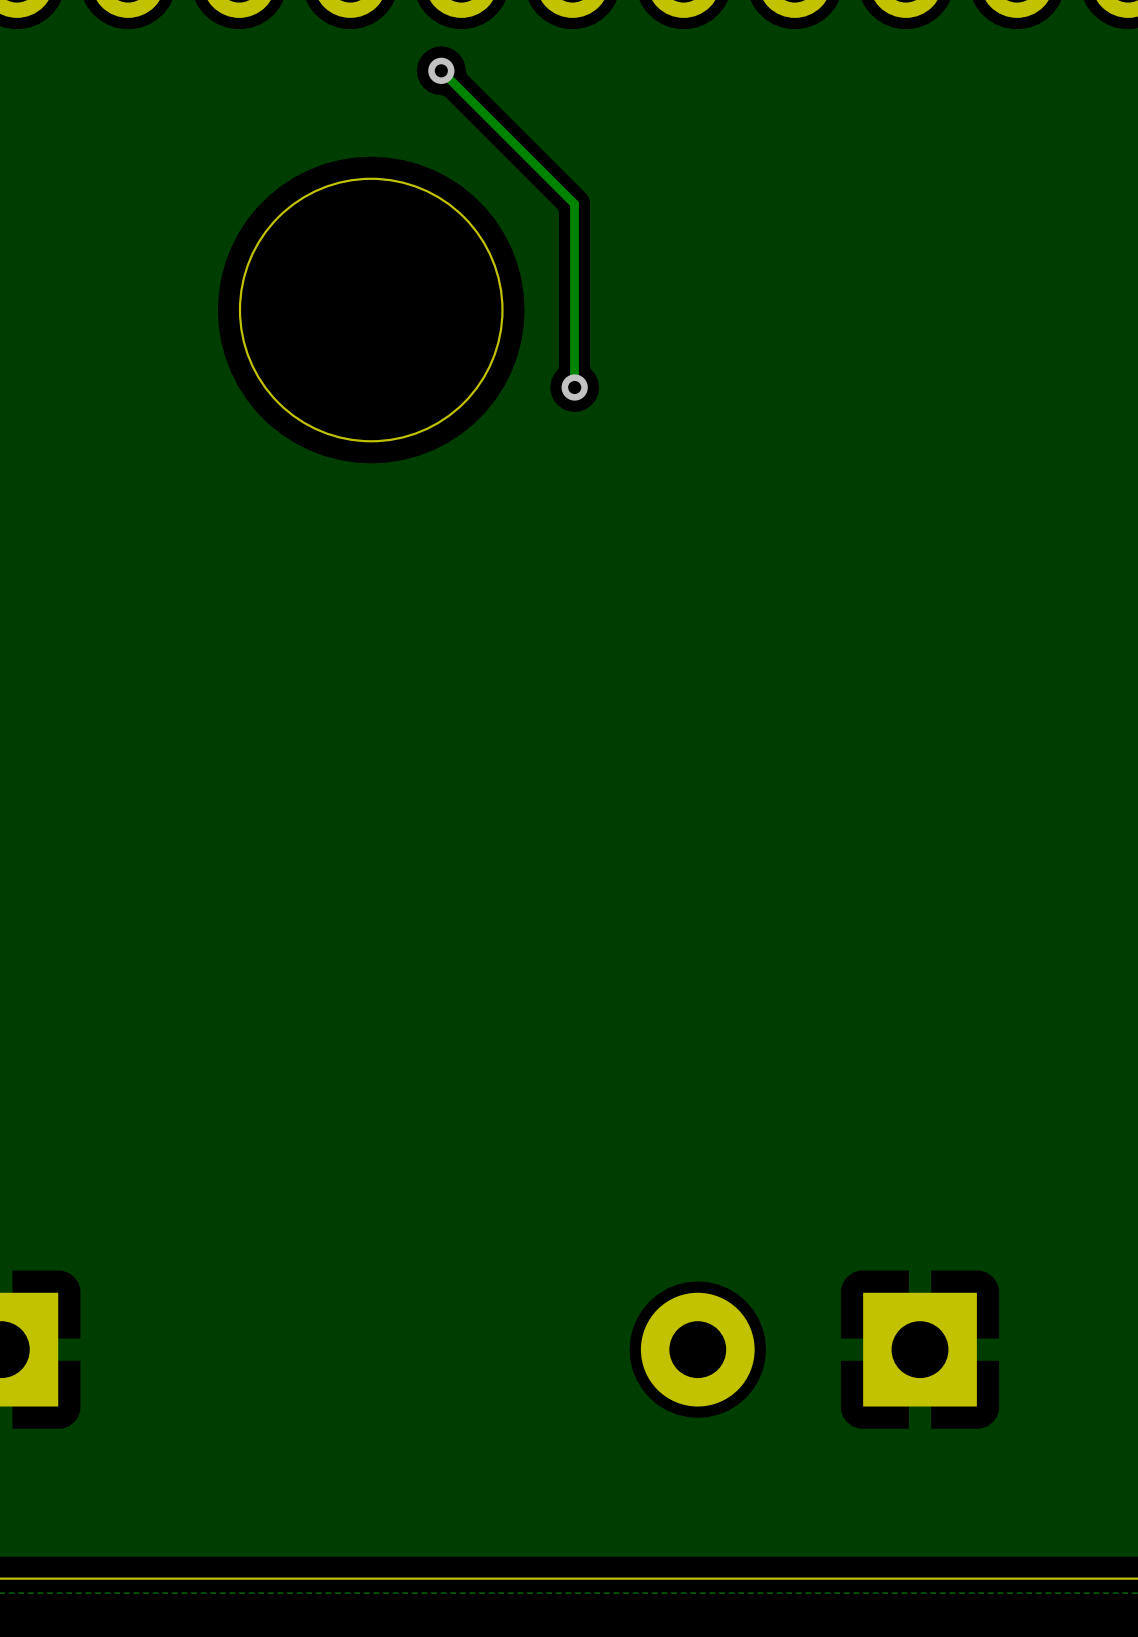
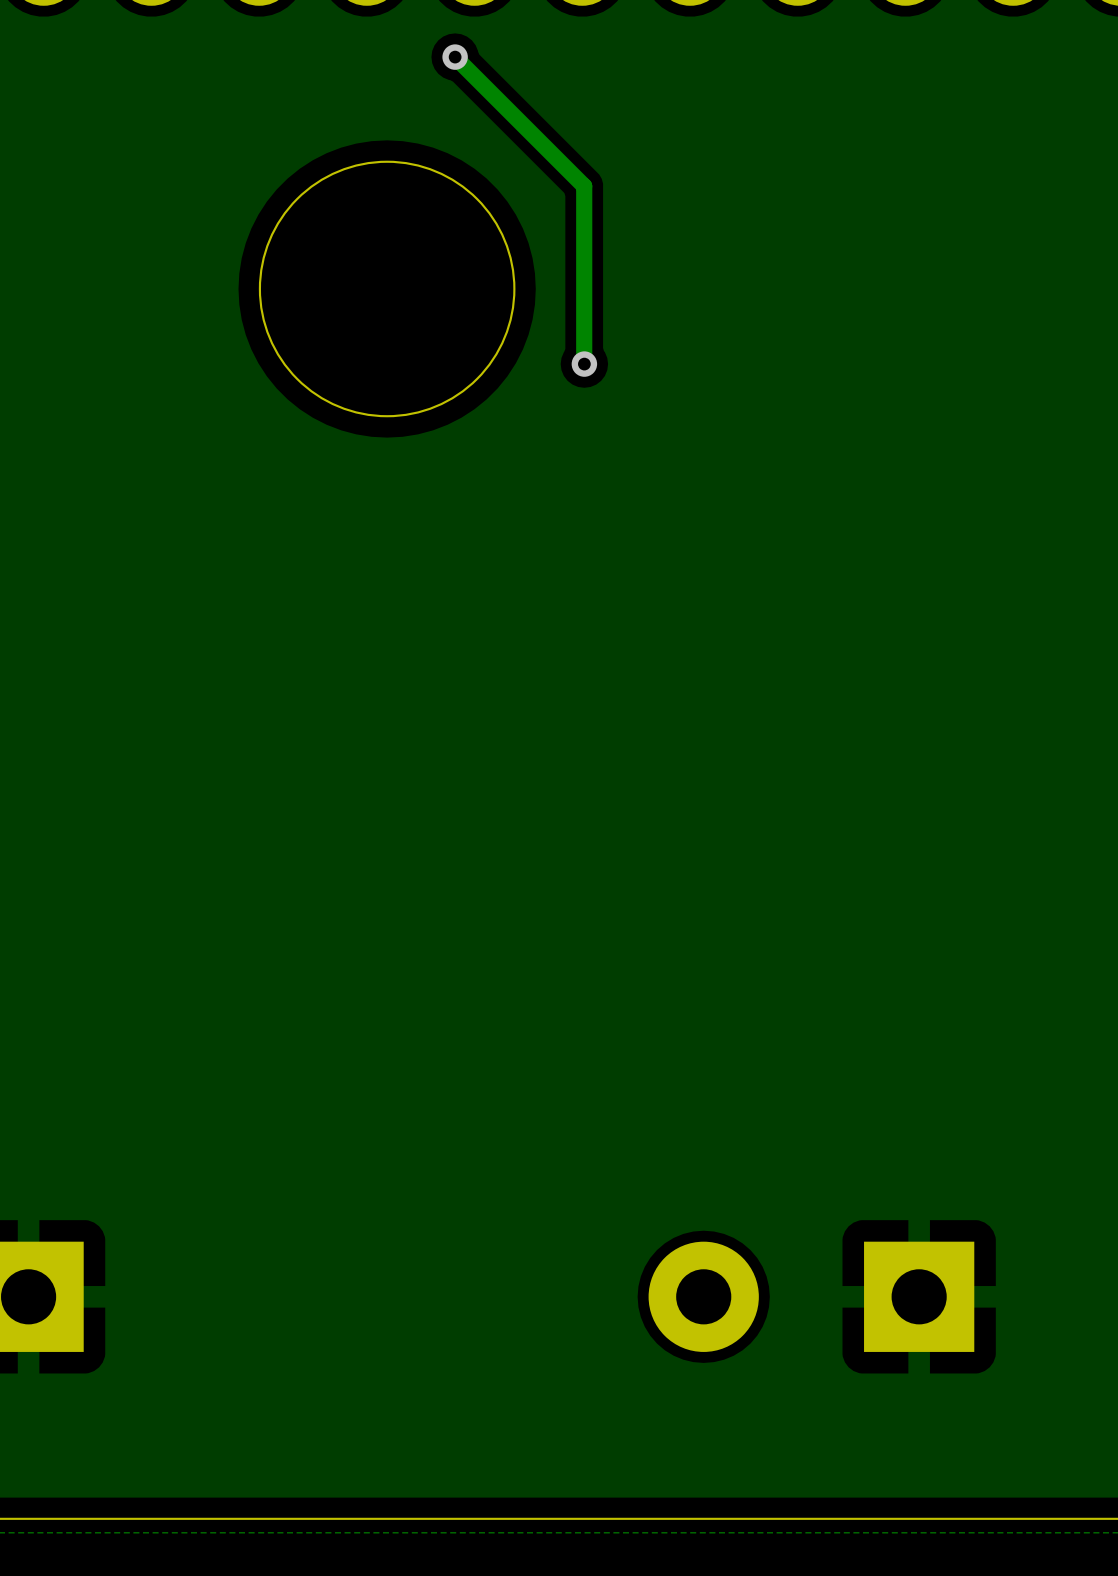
track width: thin (441, 70) (574, 203) (574, 387) -> thick (455, 57) (584, 186) (584, 363)

